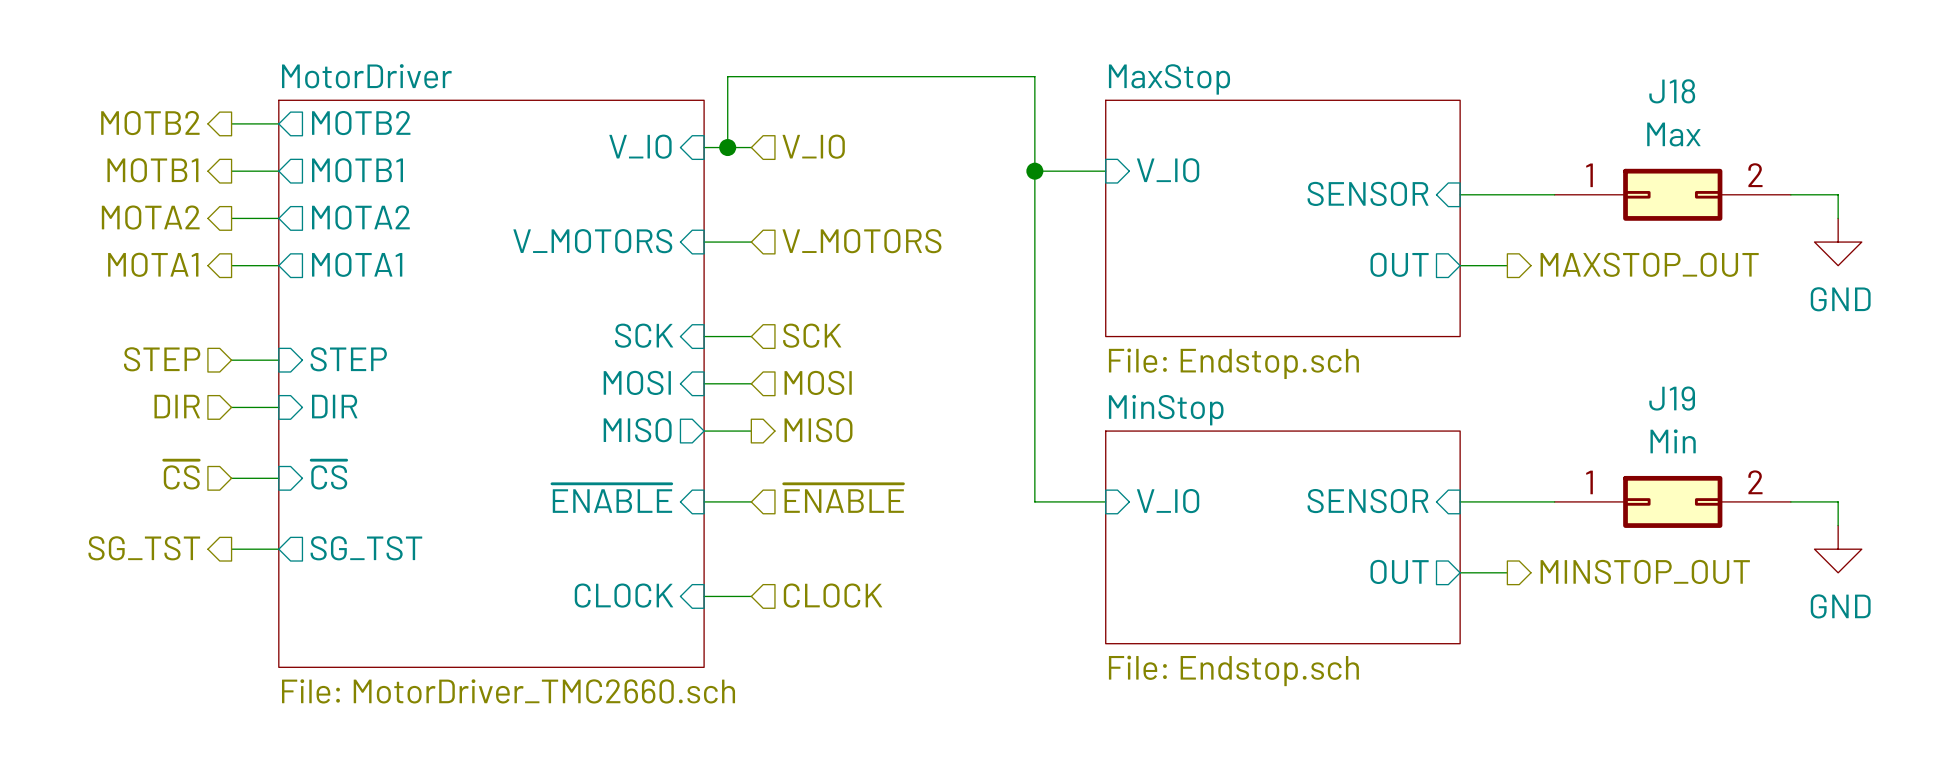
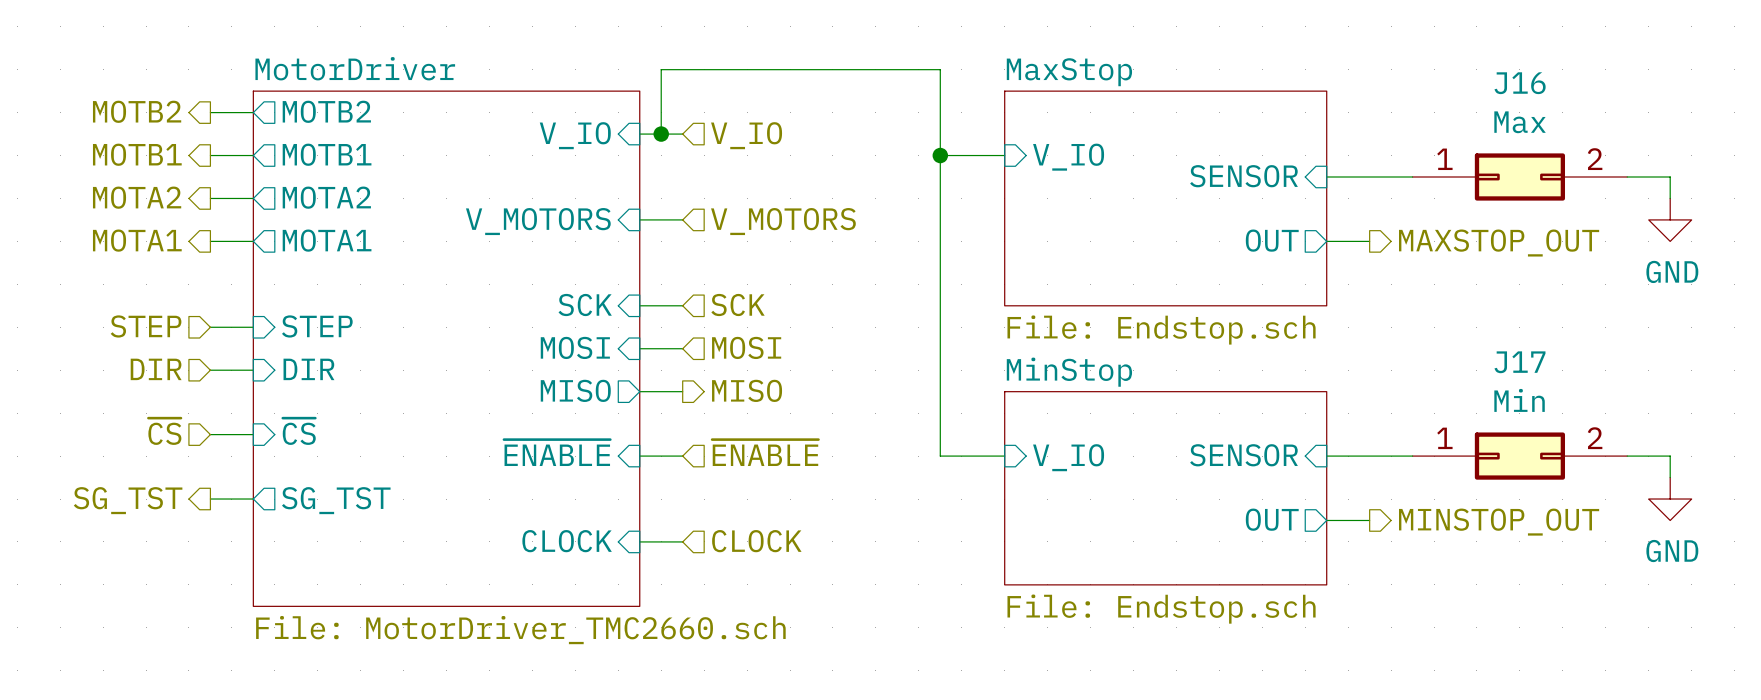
J18 name: J18 (1672, 91) -> J16 (1520, 83)
J19 name: J19 (1672, 398) -> J17 (1520, 362)

